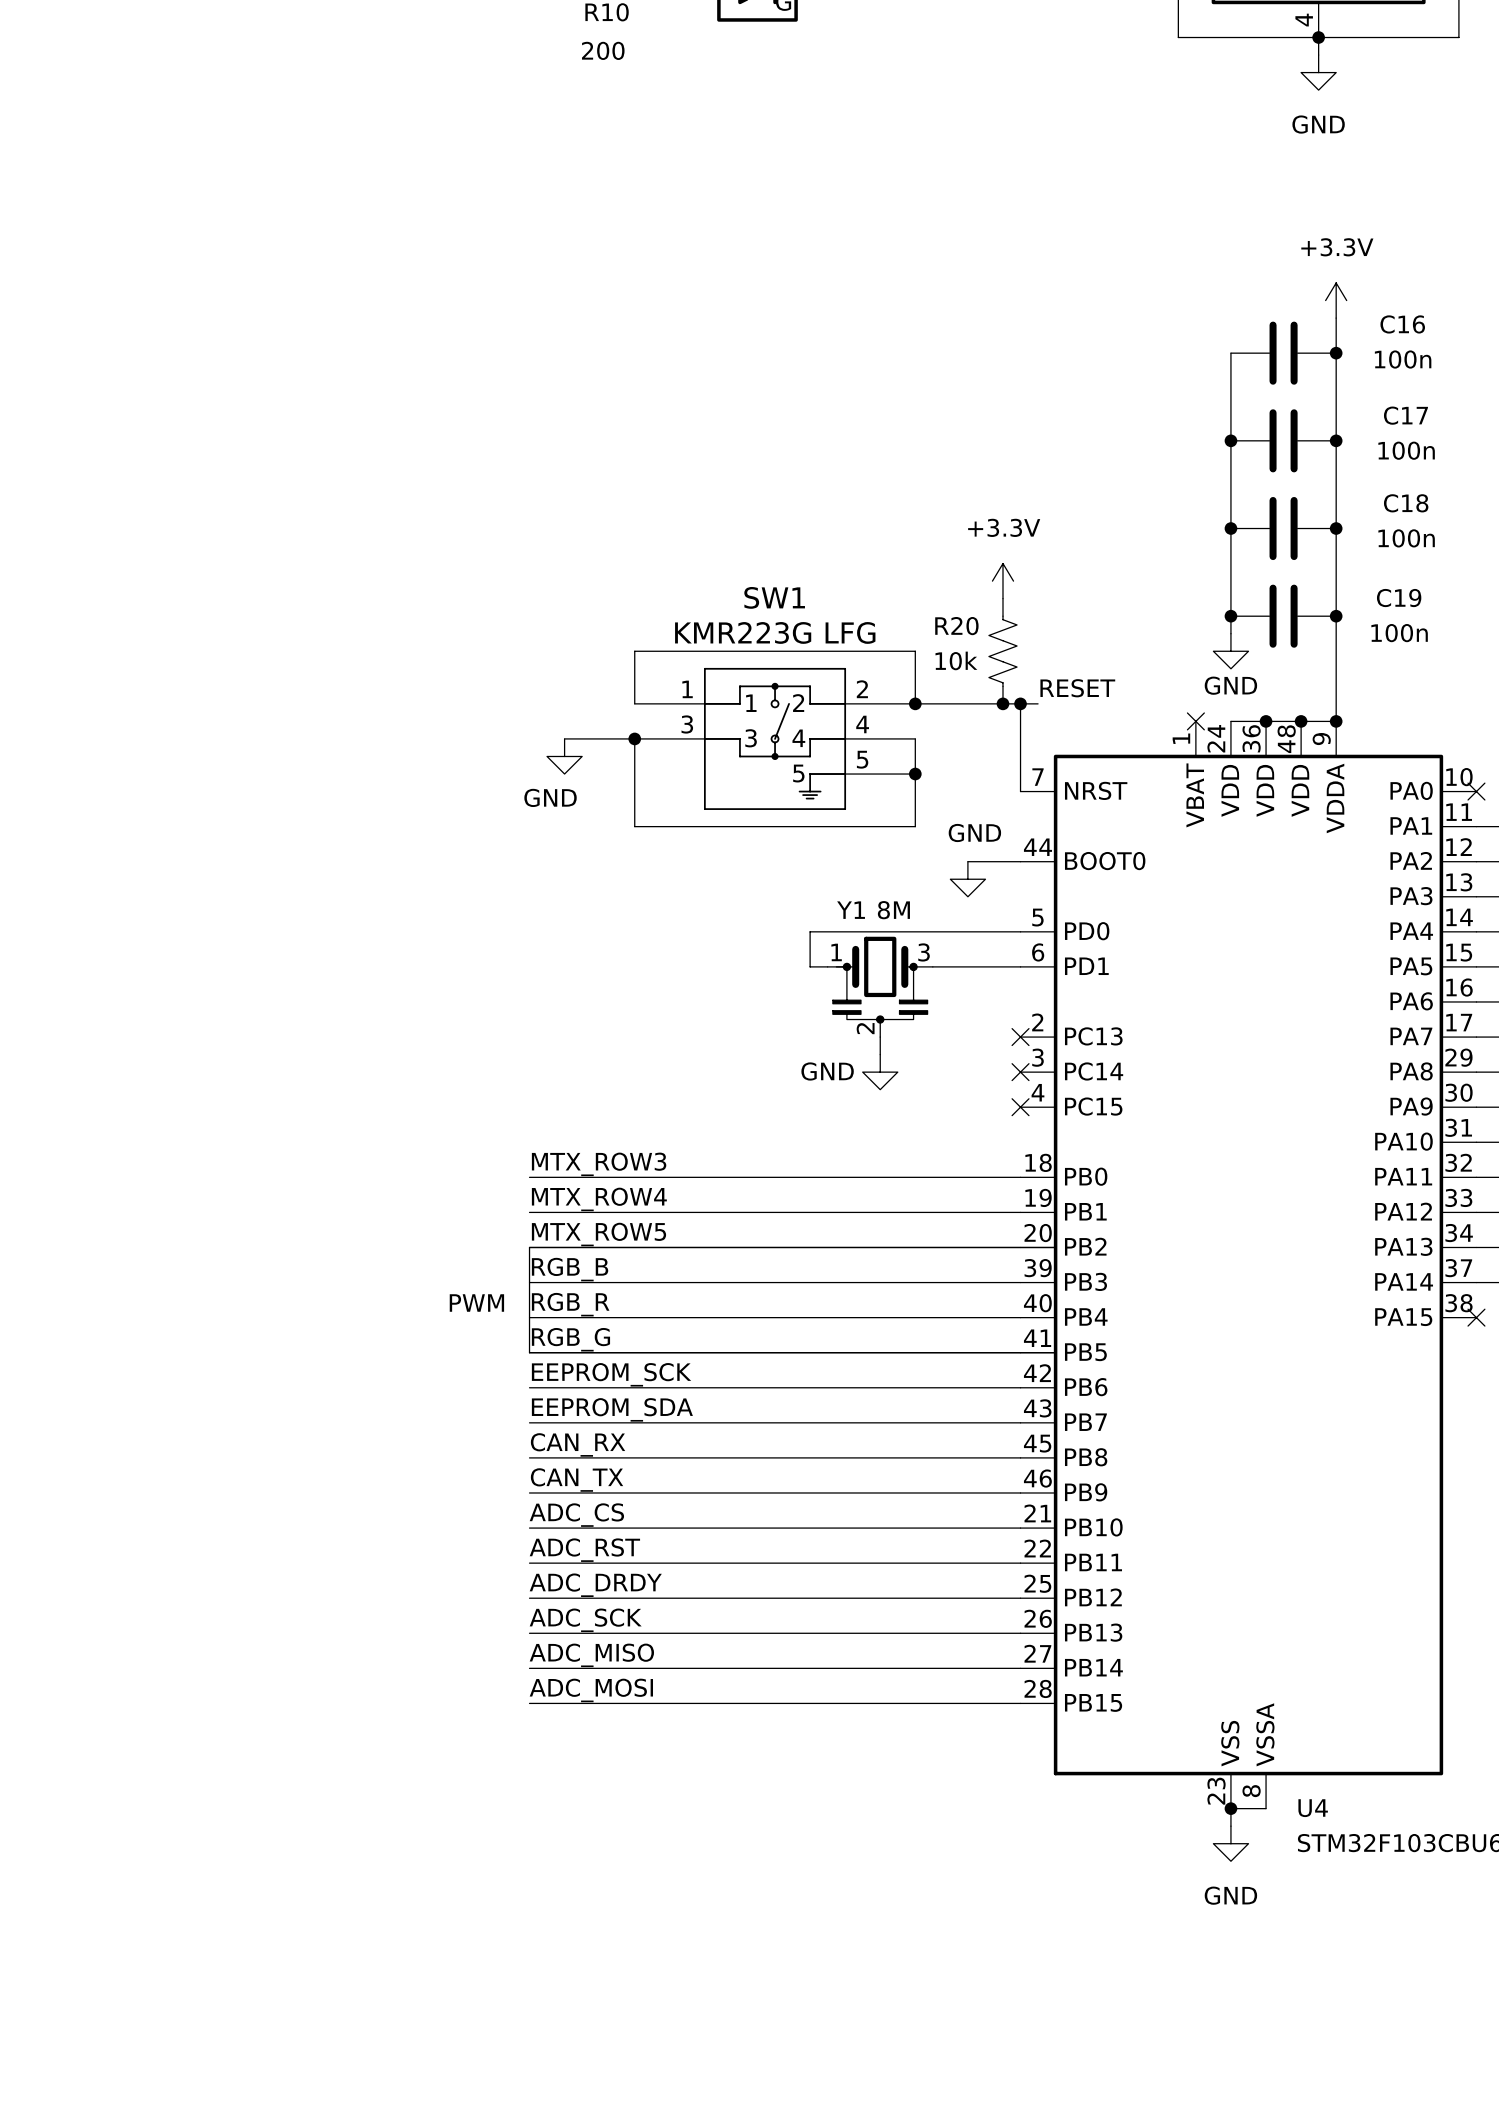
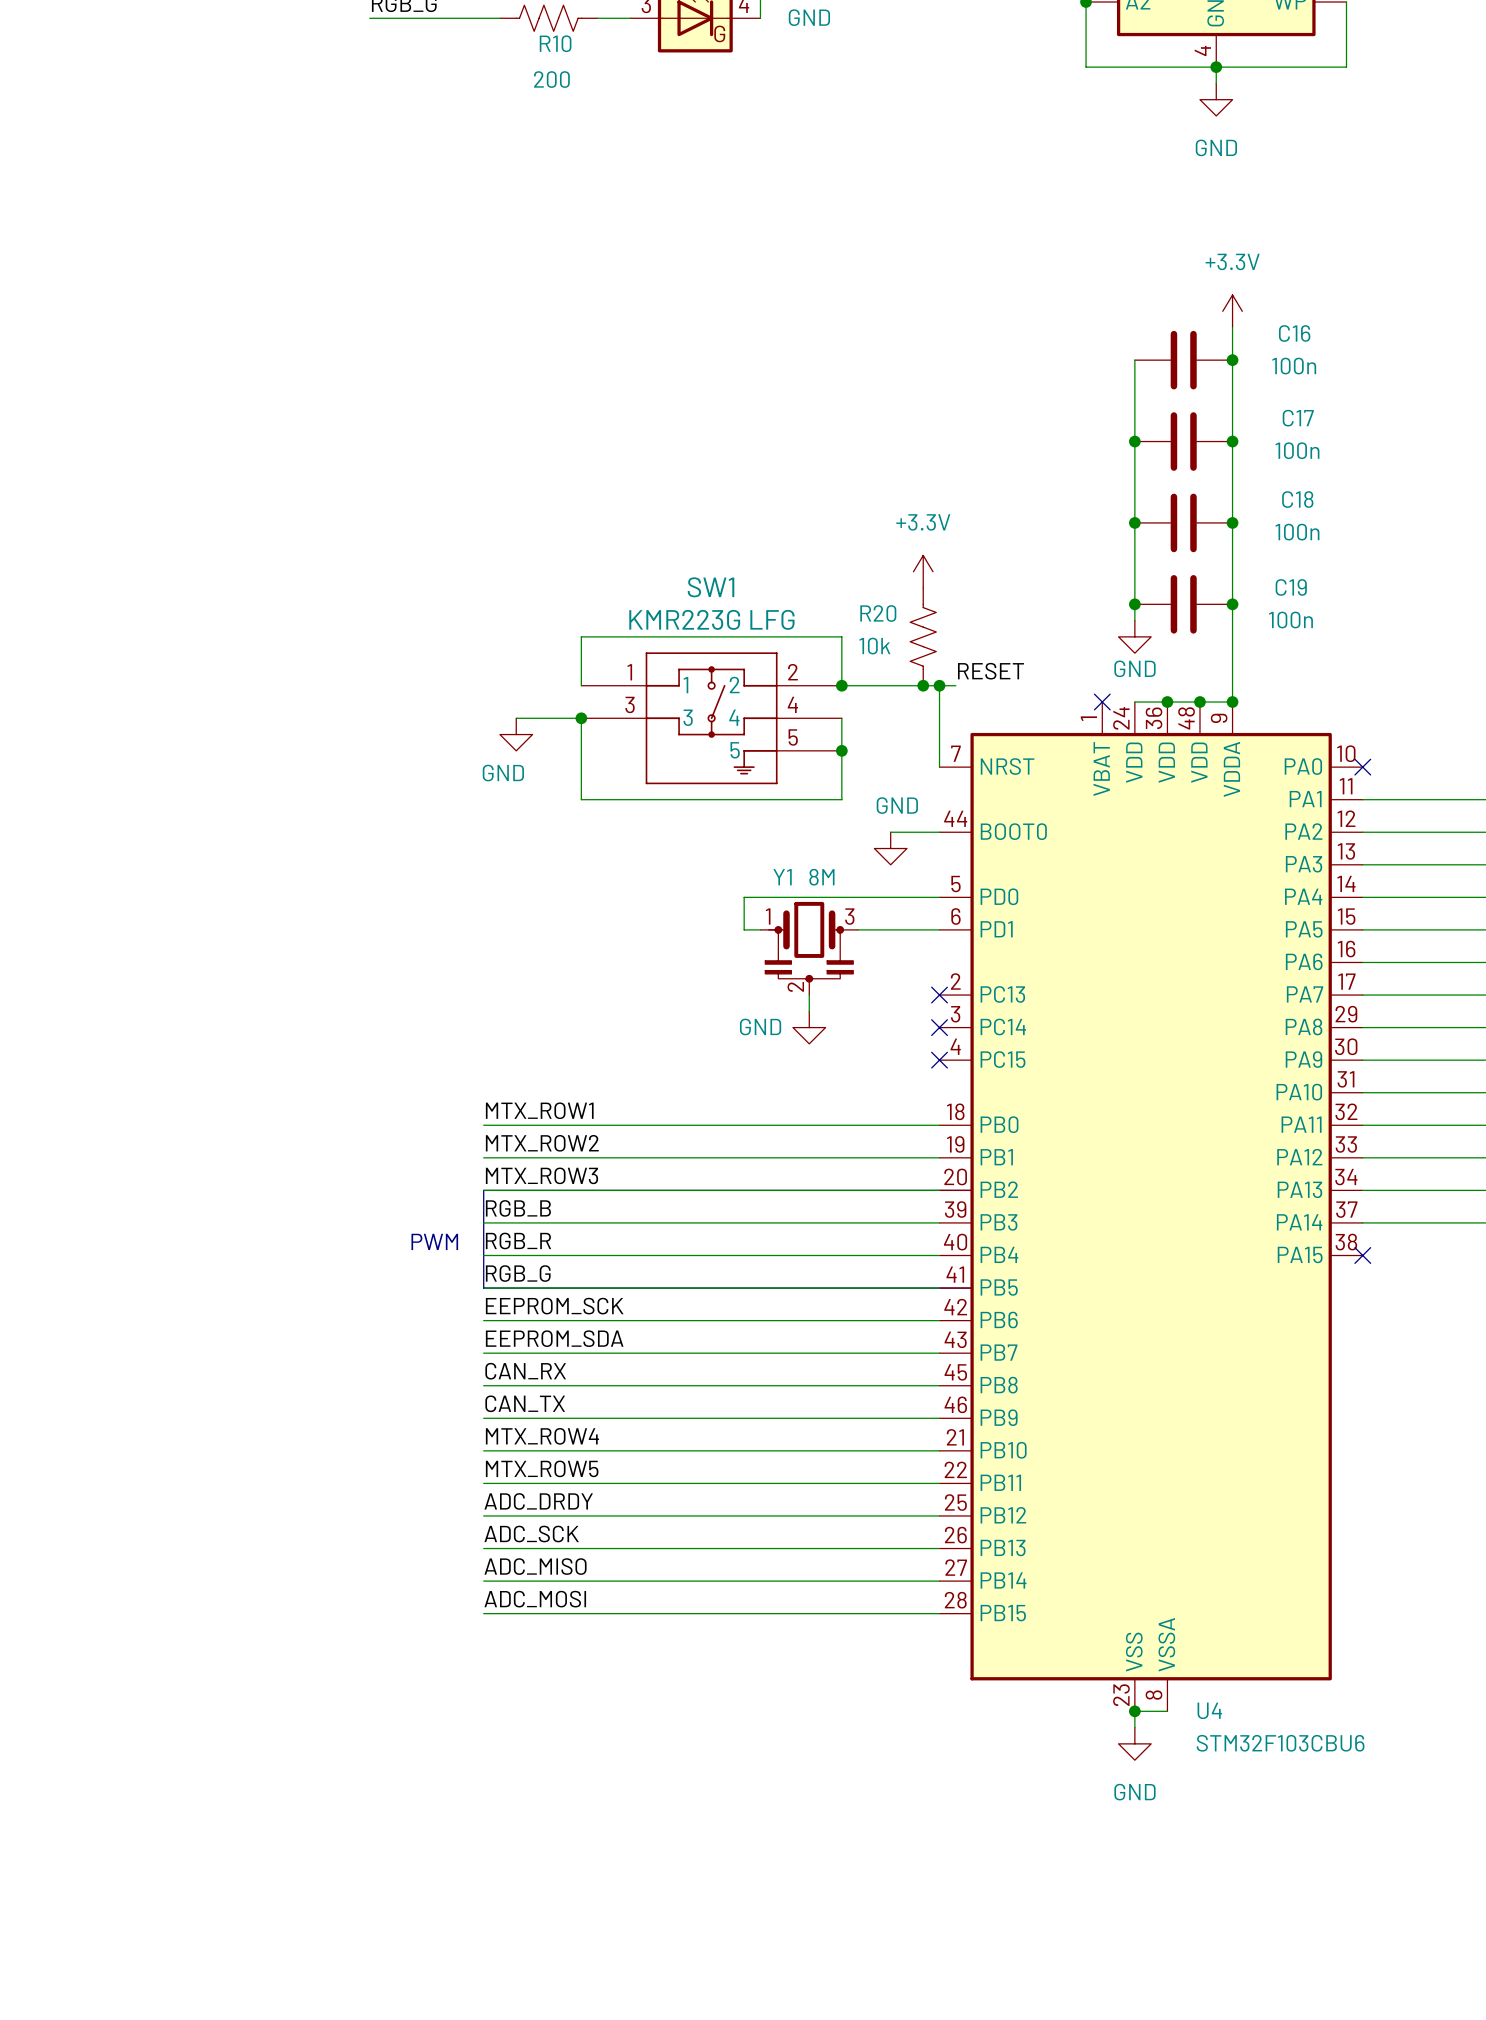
label: MTX_ROW3 (599, 1164) -> MTX_ROW1 (539, 1110)
label: MTX_ROW4 (599, 1199) -> MTX_ROW2 (542, 1143)
label: MTX_ROW5 (598, 1234) -> MTX_ROW3 (541, 1175)
label: ADC_CS (576, 1515) -> MTX_ROW4 (542, 1436)
label: ADC_RST (584, 1550) -> MTX_ROW5 (542, 1468)

